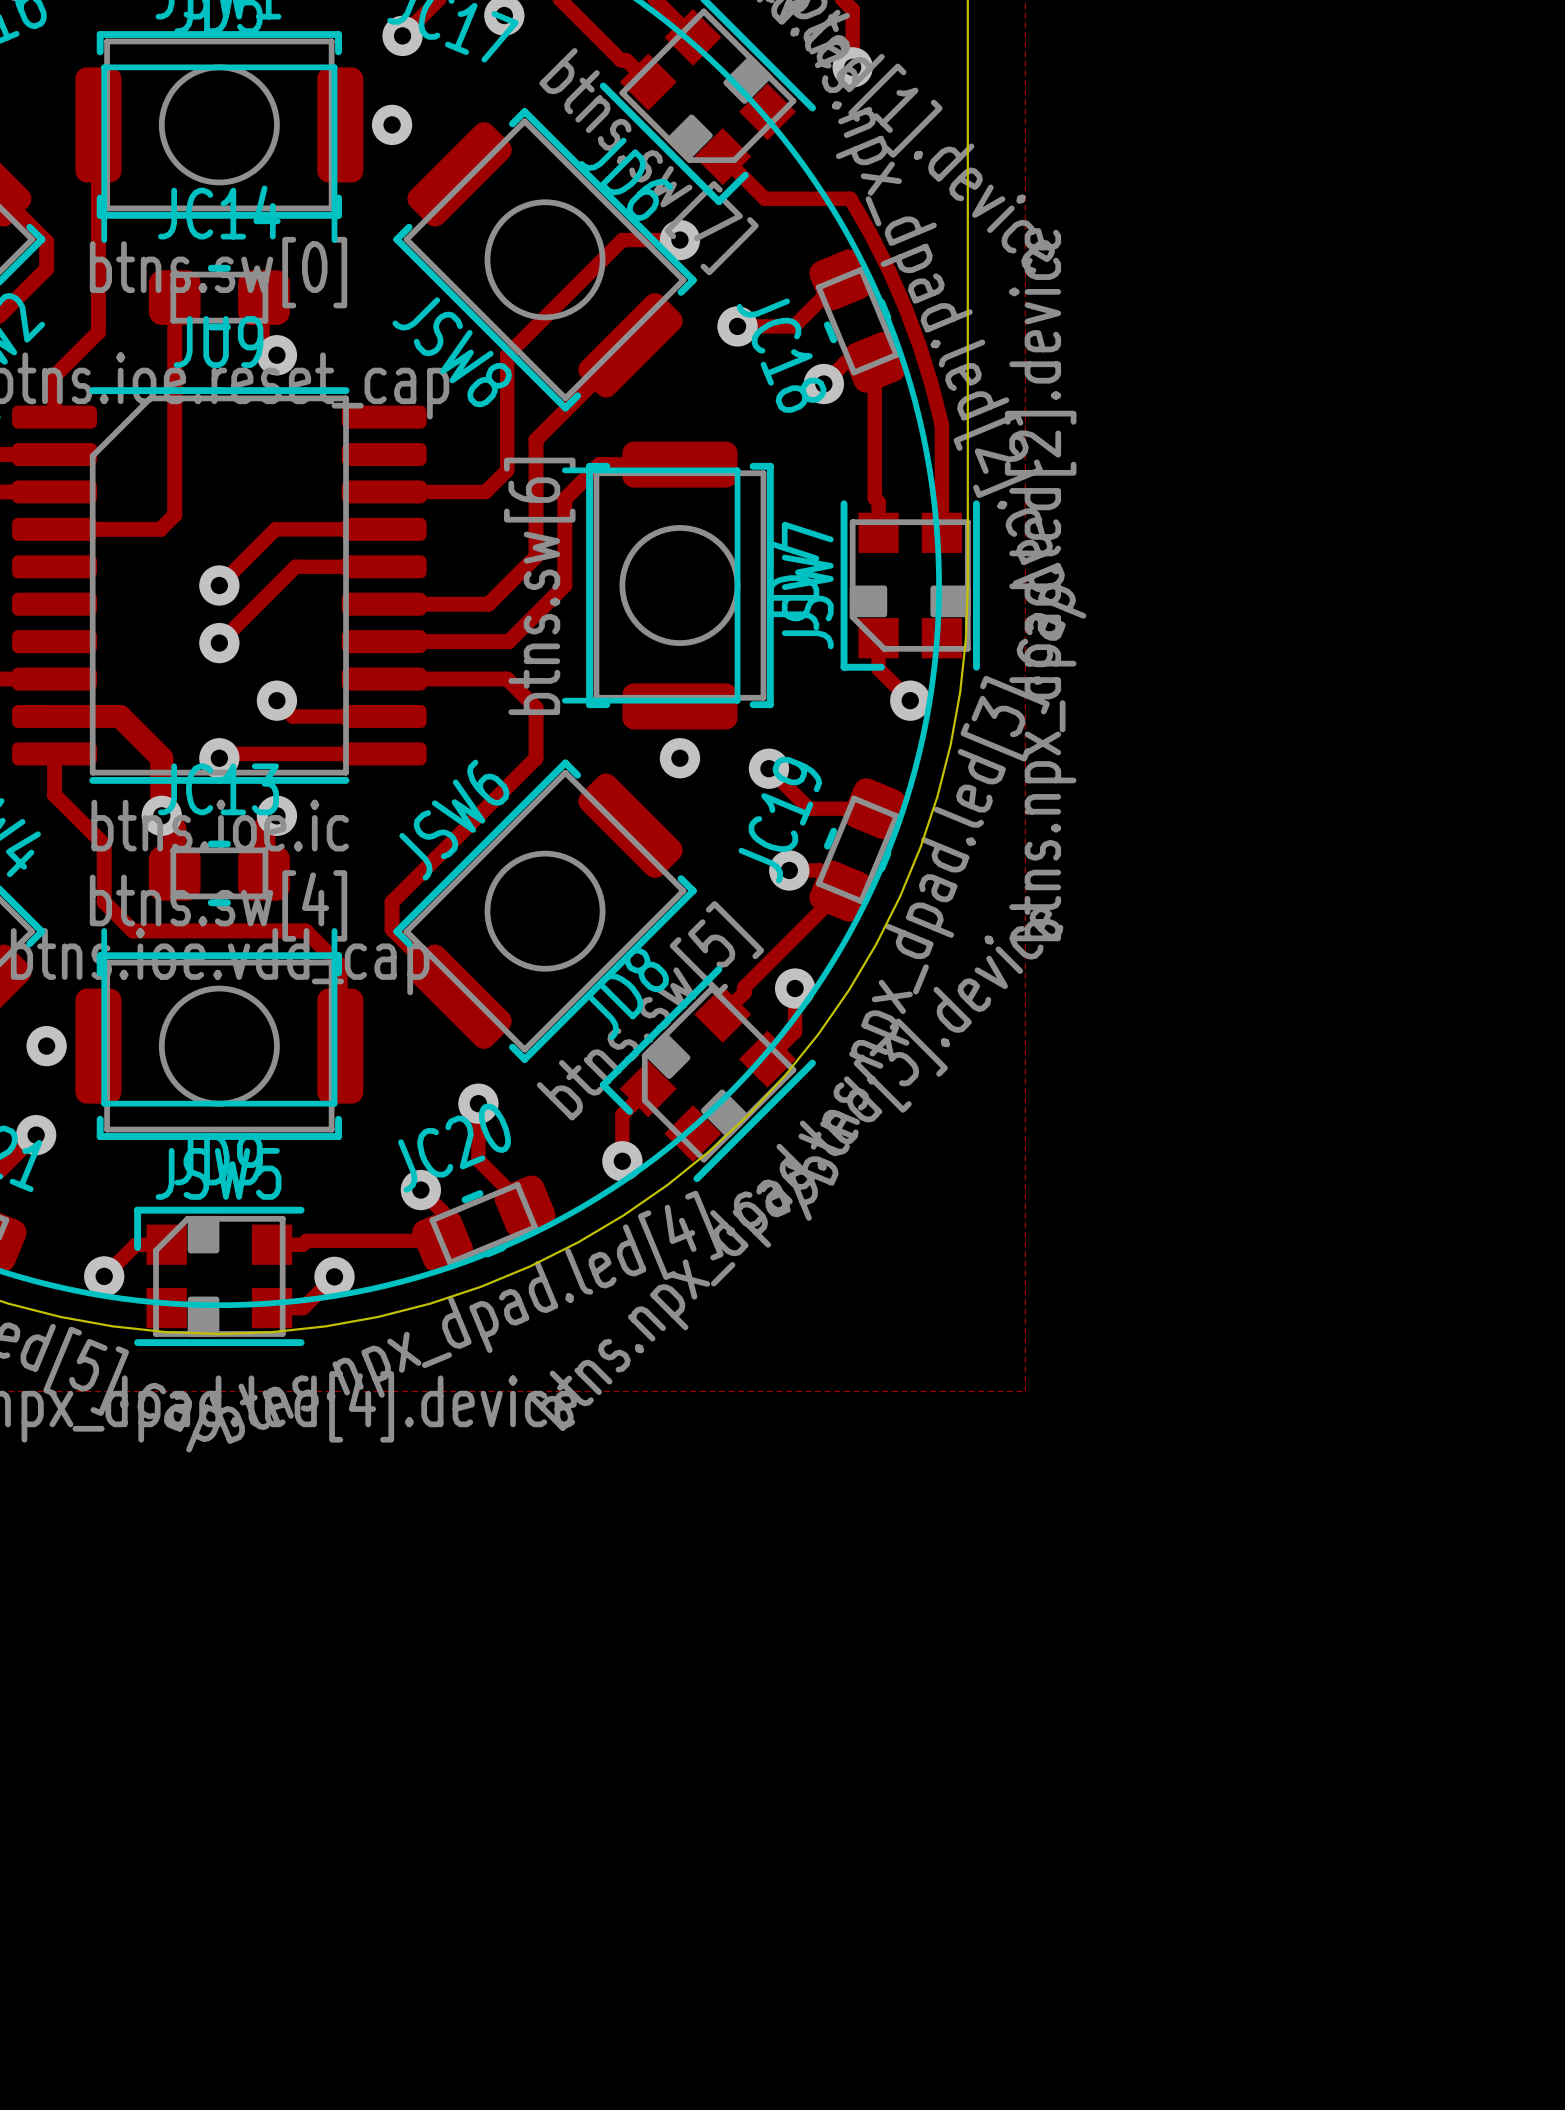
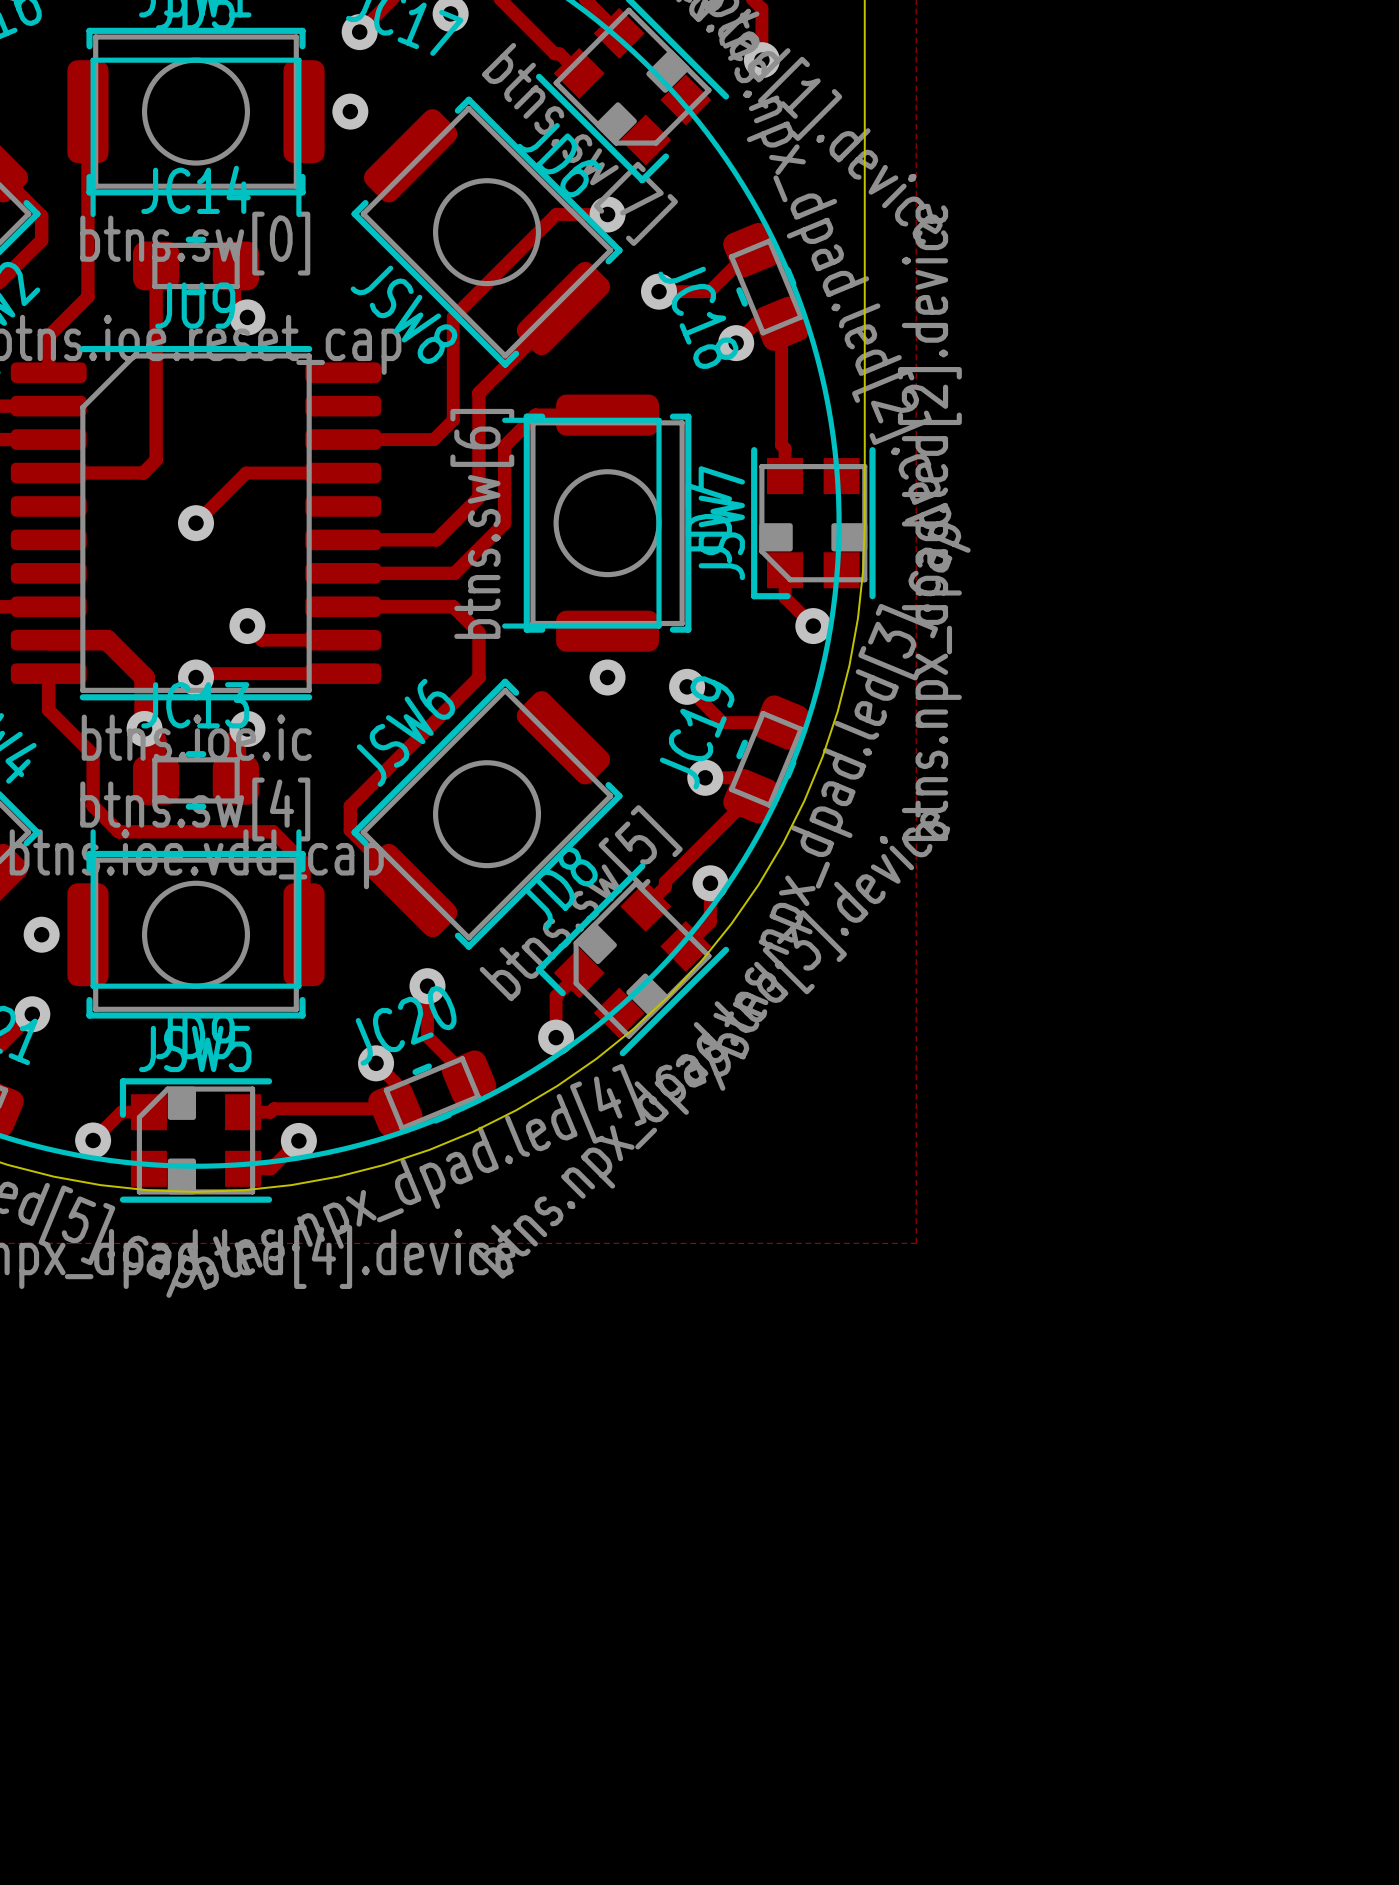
track: (722, 156) (764, 198) (850, 198) (889, 270) (919, 346) (931, 385) (941, 424) (941, 532) -> none
track: (384, 566) (295, 566) (219, 643) -> none
via: (219, 643) -> none

